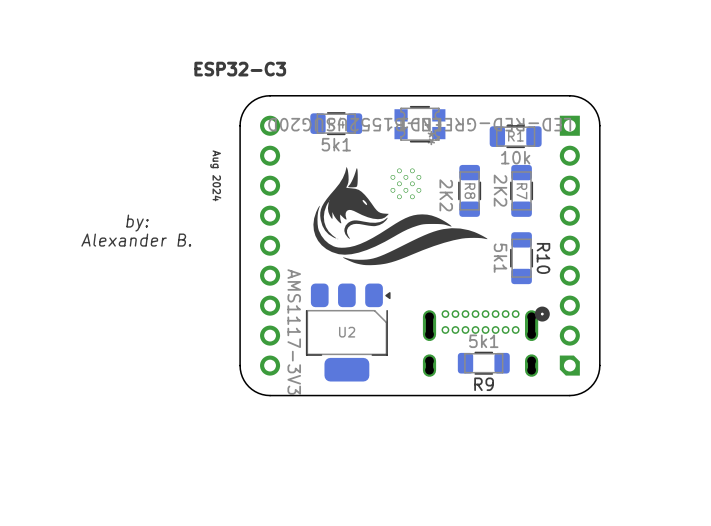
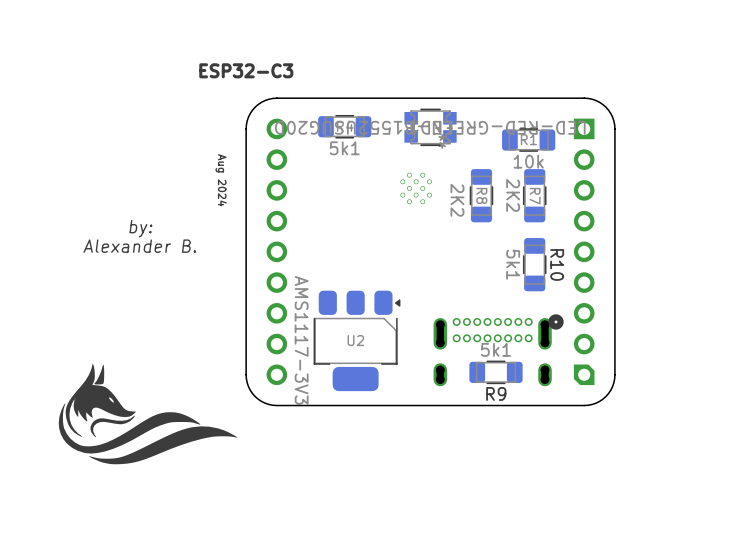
drawing: [313, 166, 488, 266] -> none
drawing: none -> [58, 363, 238, 465]

